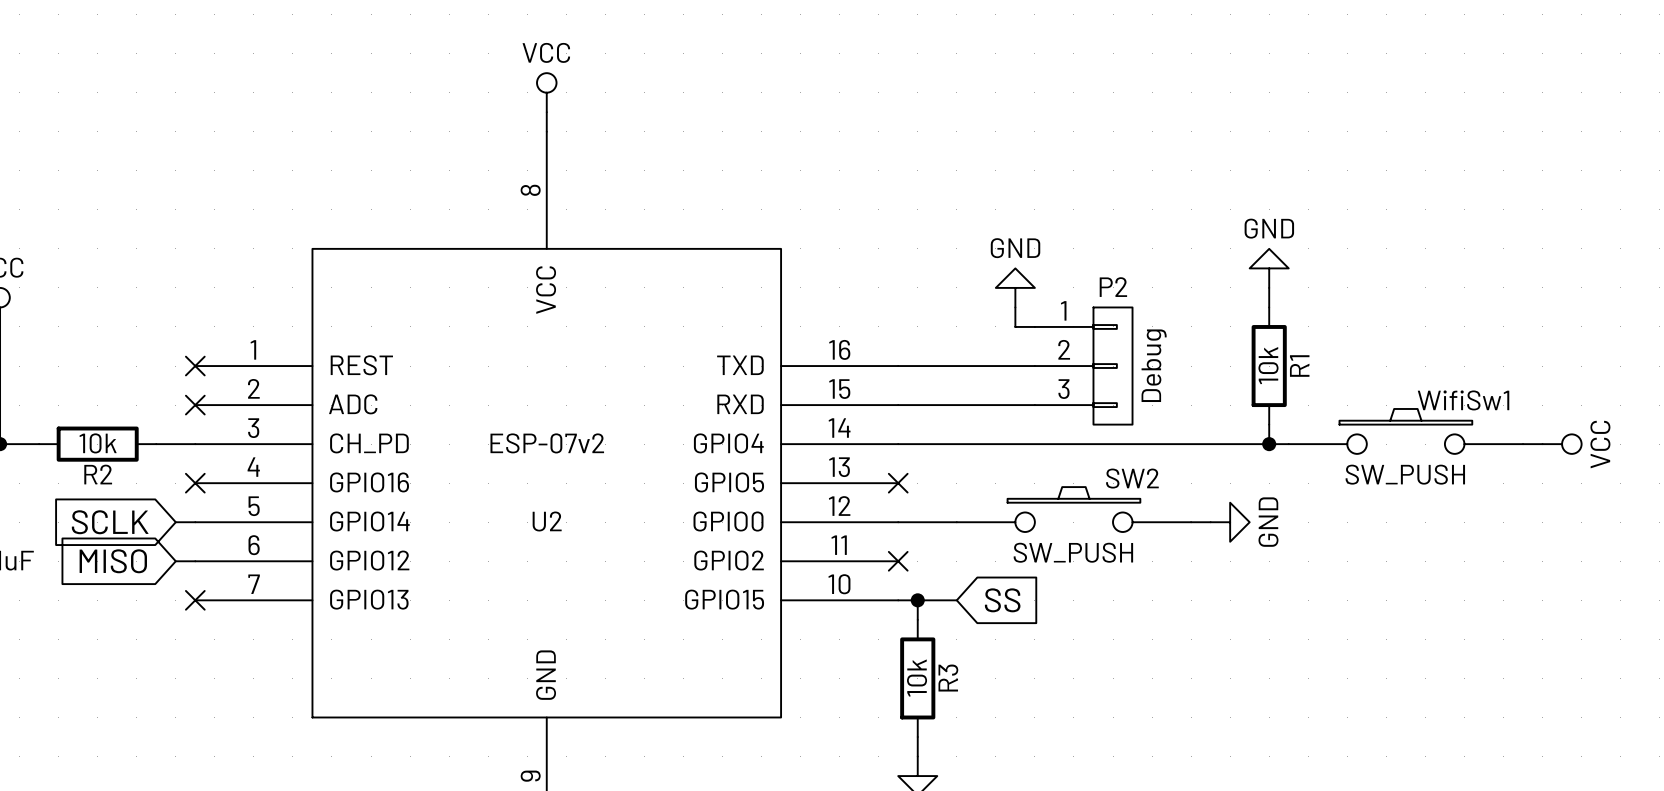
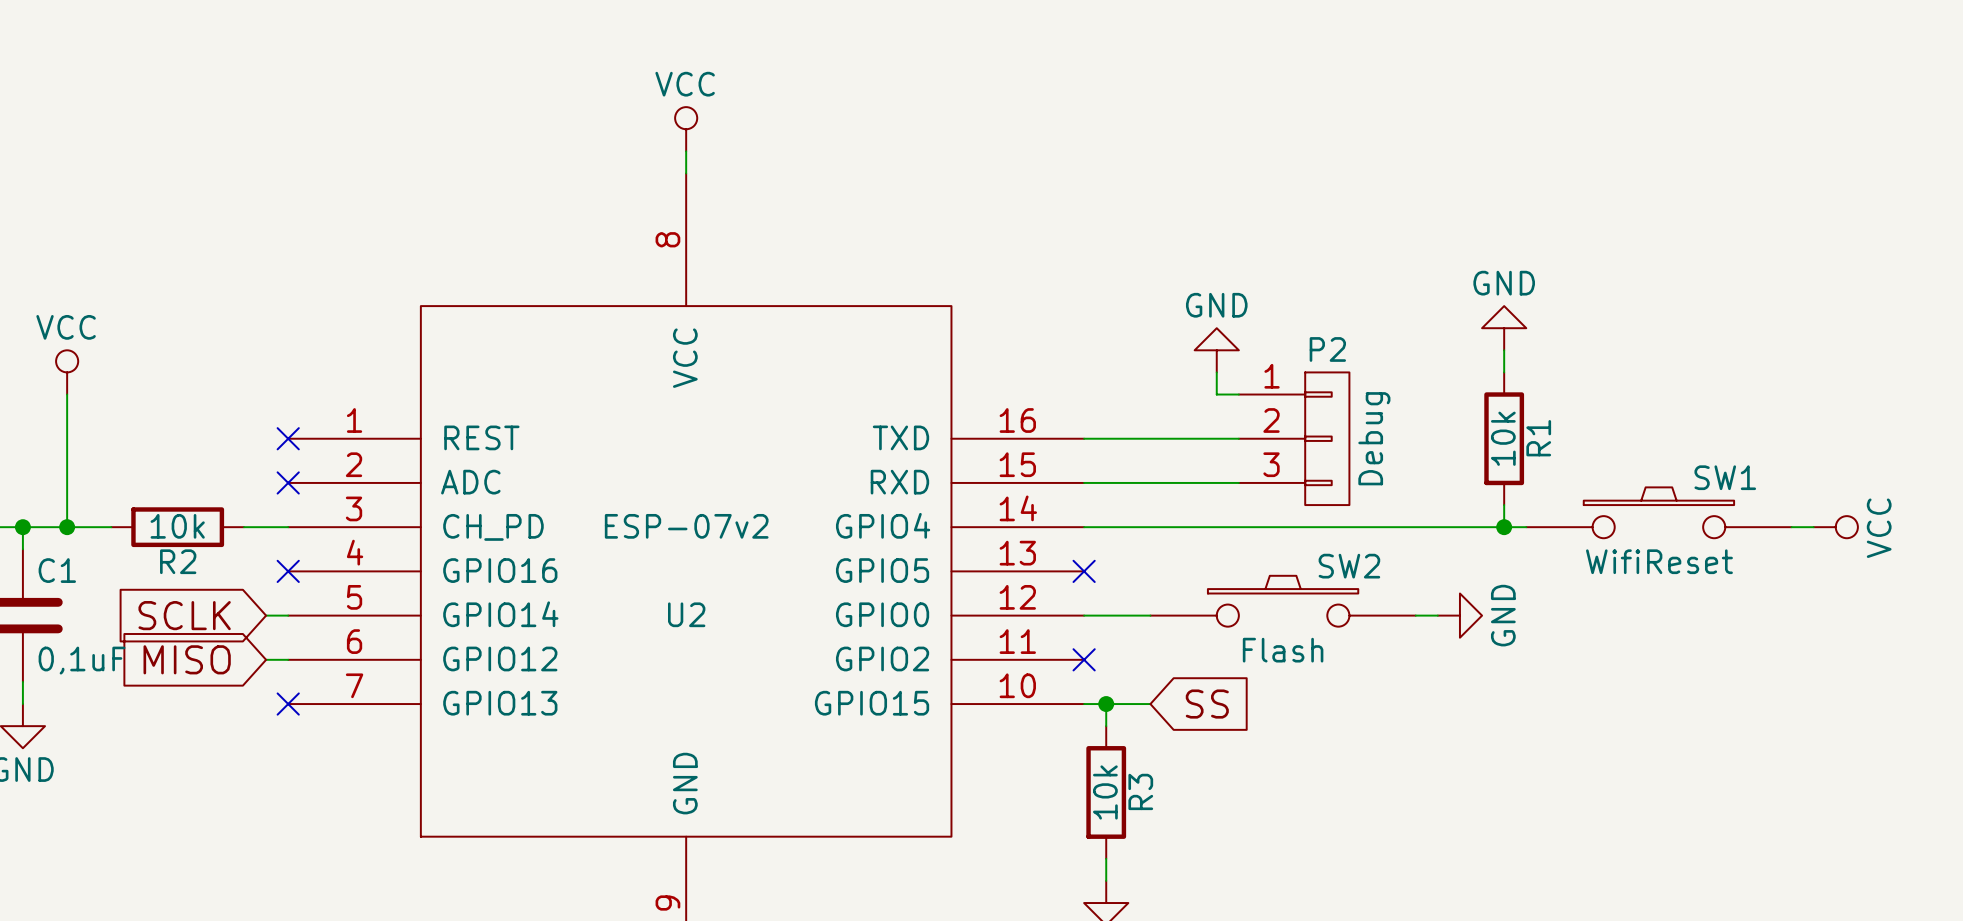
WifiSw1 name: WifiSw1 (1463, 400) -> SW1 (1725, 477)
WifiSw1 value: SW_PUSH (1405, 474) -> WifiReset (1659, 561)
SW2 value: SW_PUSH (1073, 552) -> Flash (1283, 650)

